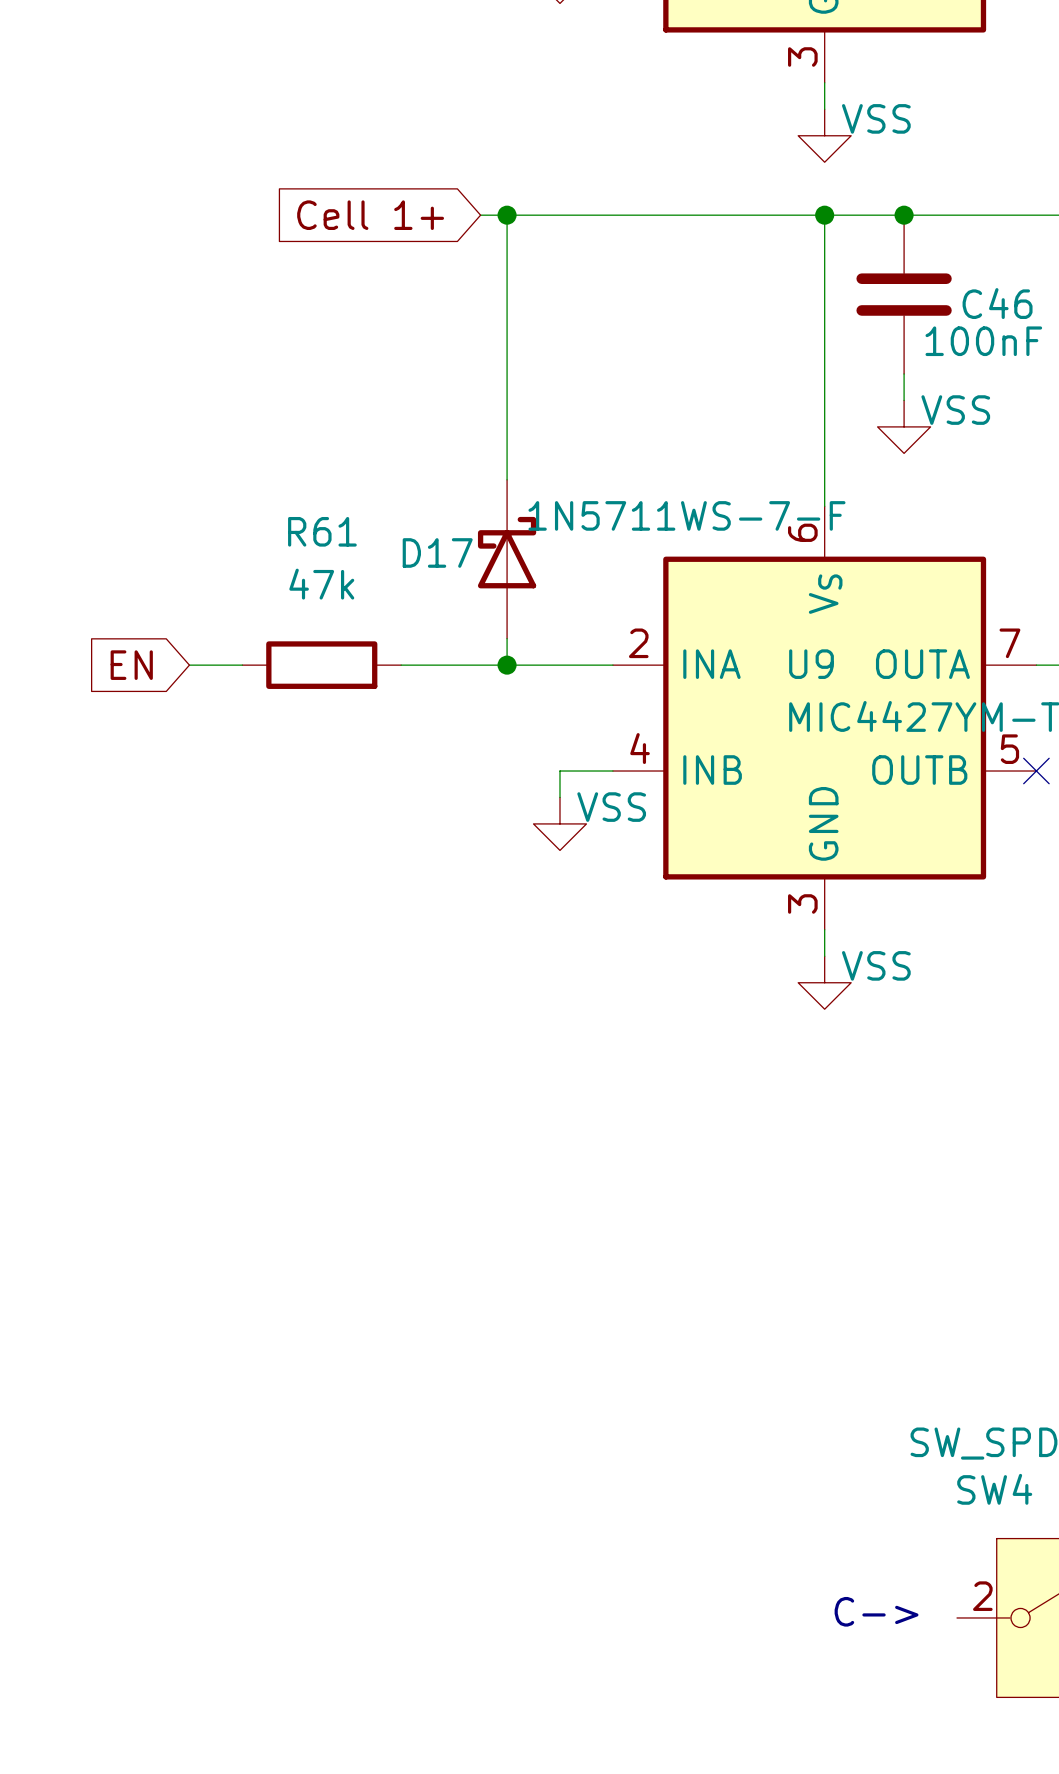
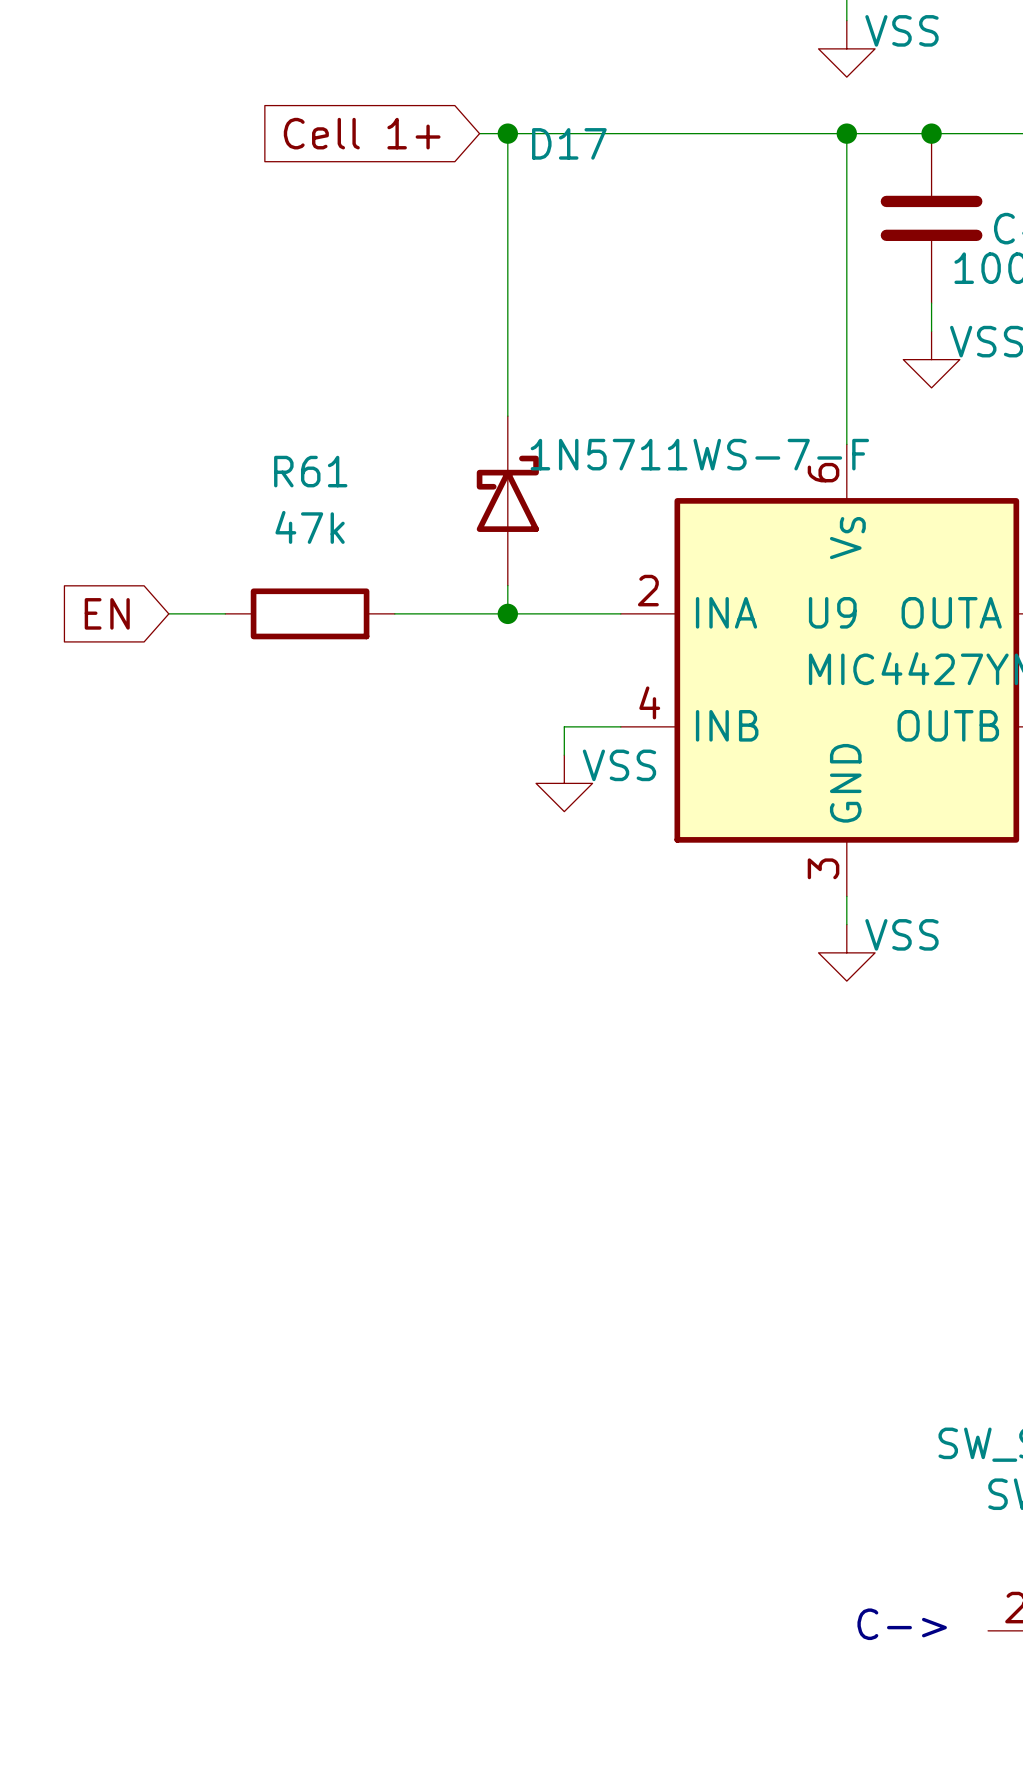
D17 name position: D17 (437, 552) -> D17 (569, 143)

